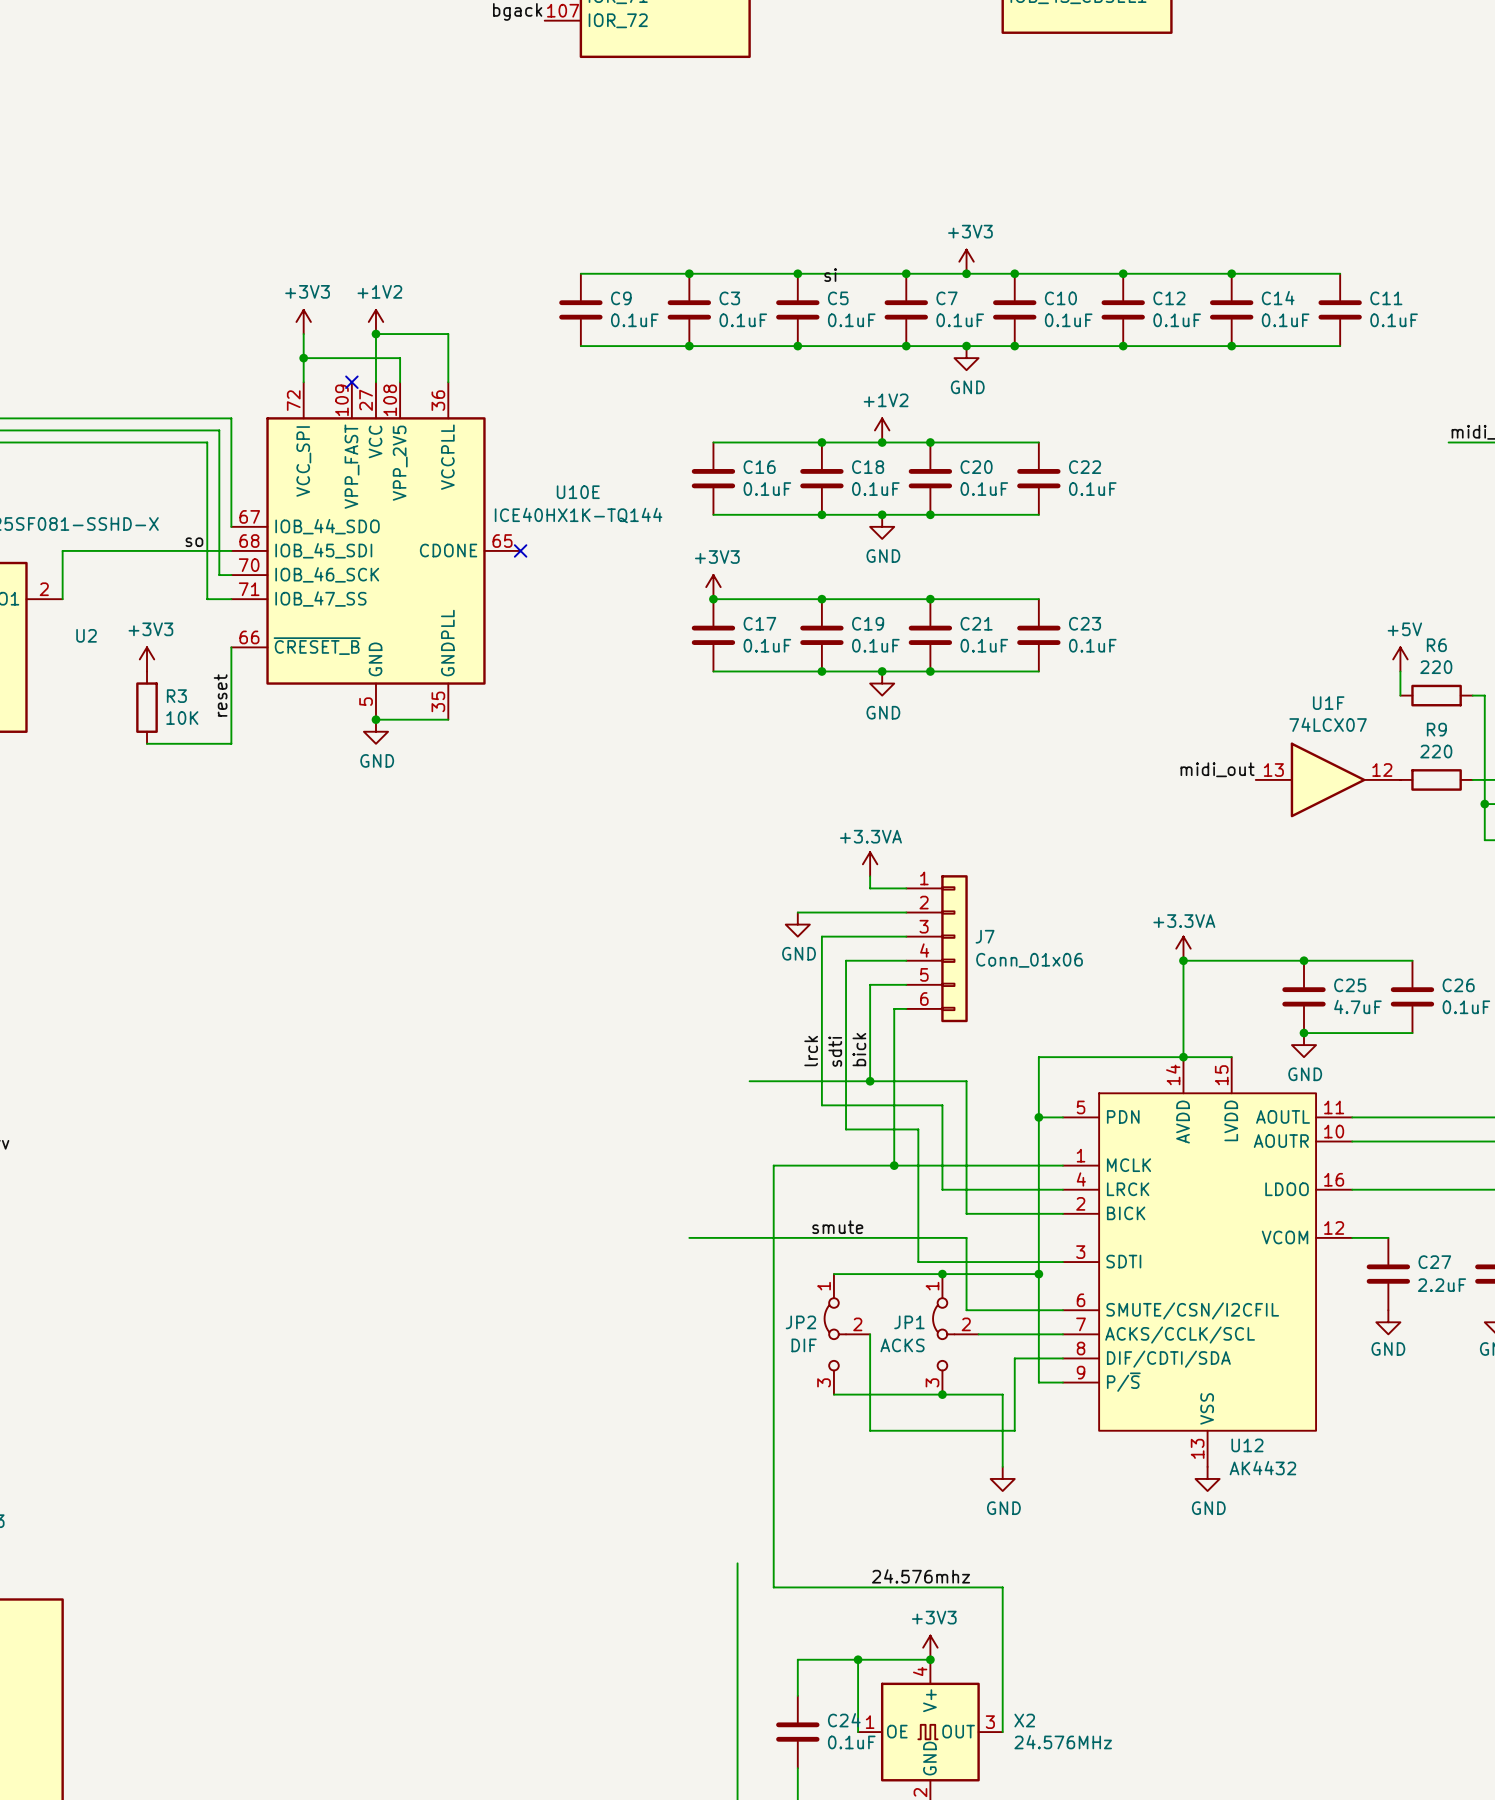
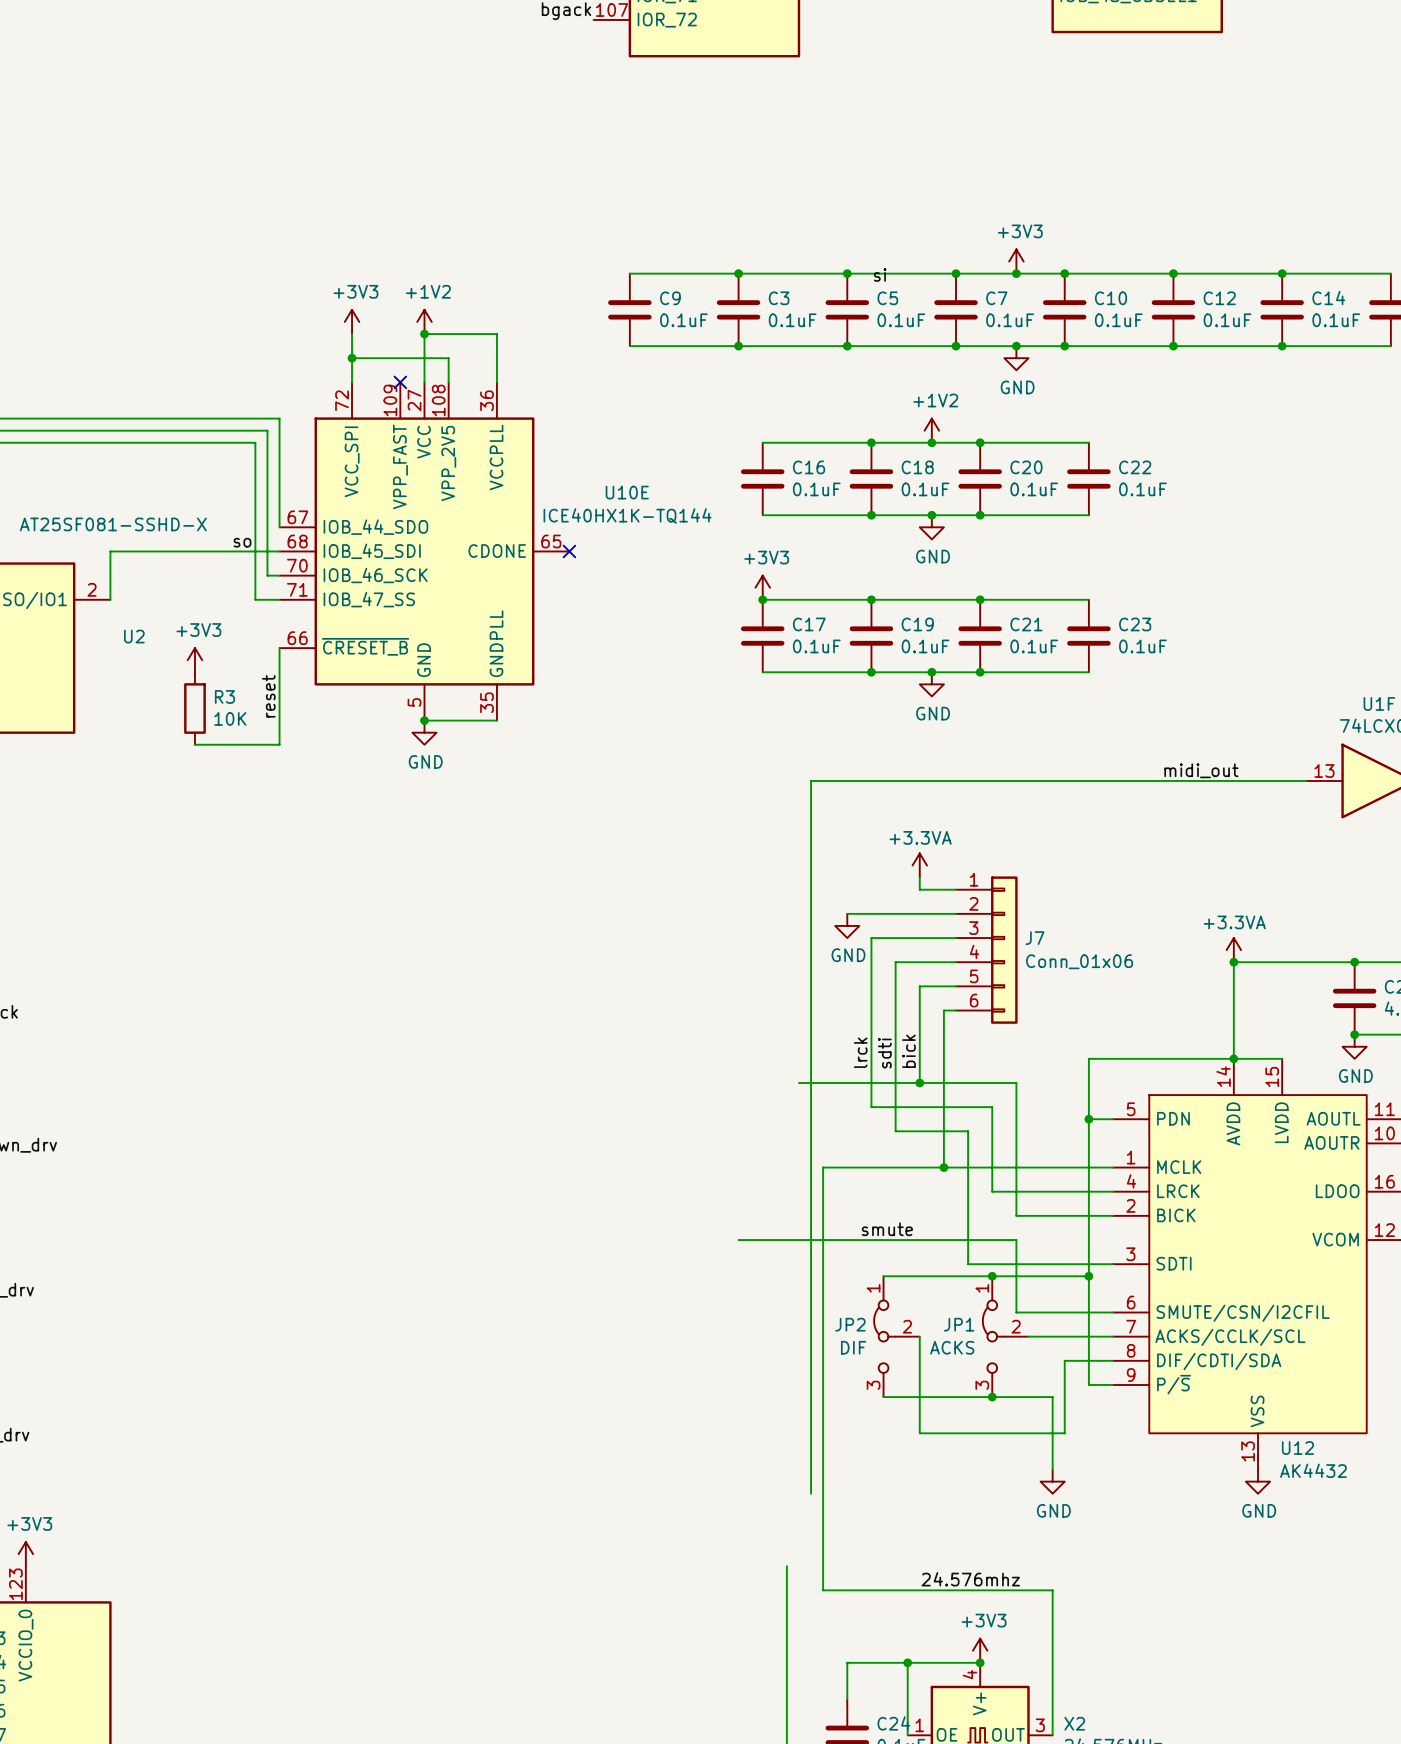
label position: midi_out (1217, 769) -> midi_out (1201, 770)
wire: none -> (1306, 780) (811, 780) (811, 1493)

